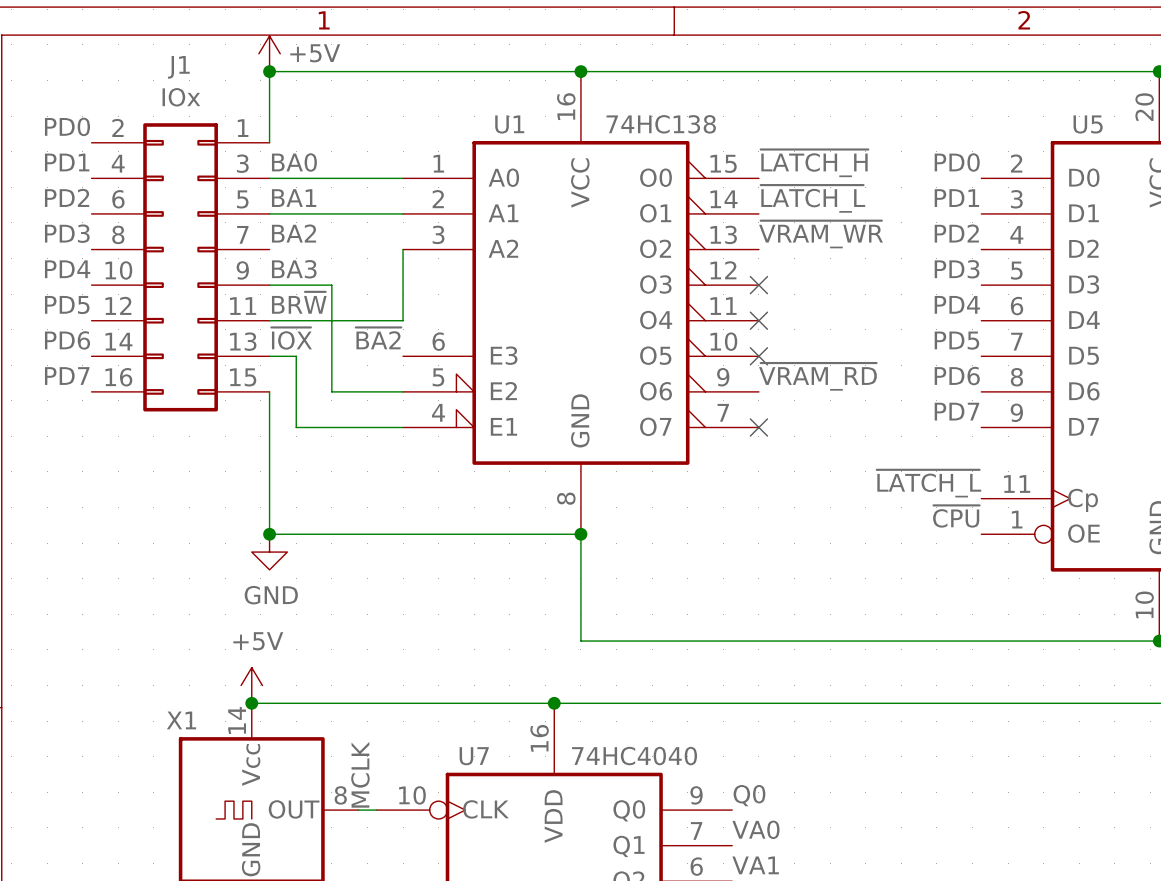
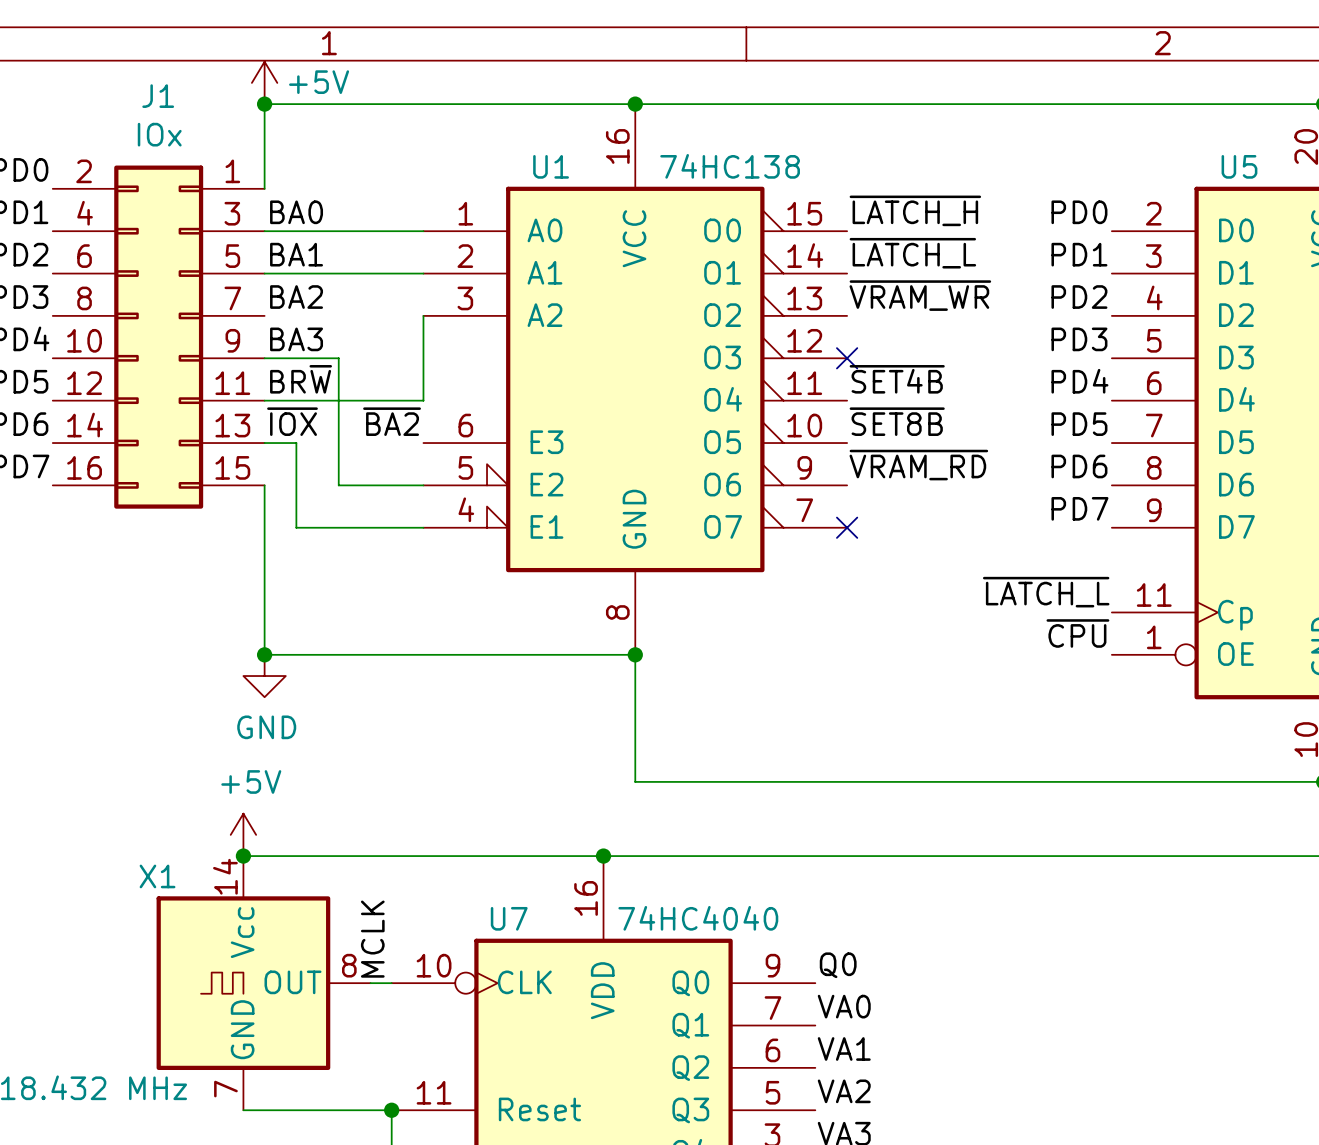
label: none -> ~{SET4B} (897, 379)
no-connect mark: (758, 320) -> none
label: none -> ~{SET8B} (897, 421)
no-connect mark: (758, 356) -> none

